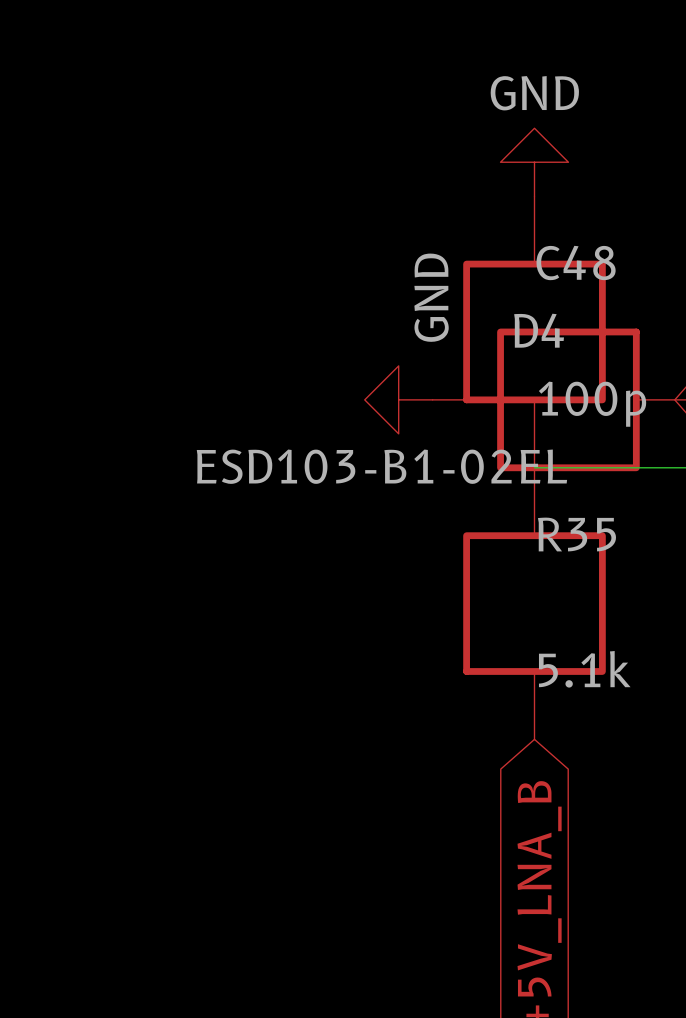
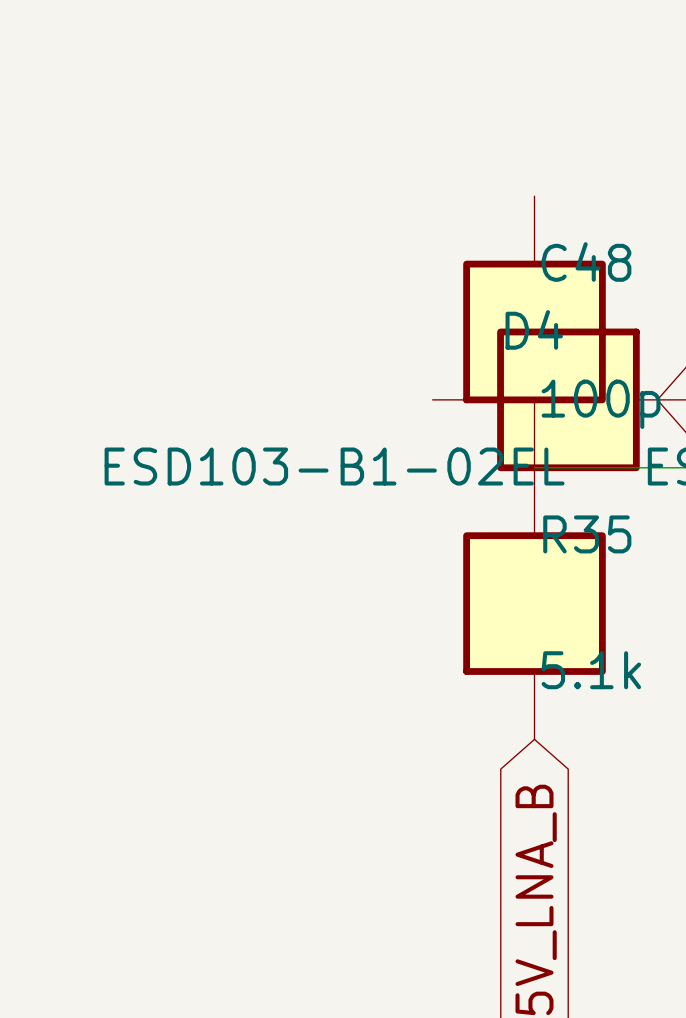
power symbol: GND (534, 162) -> none
power symbol: GND (398, 399) -> none

